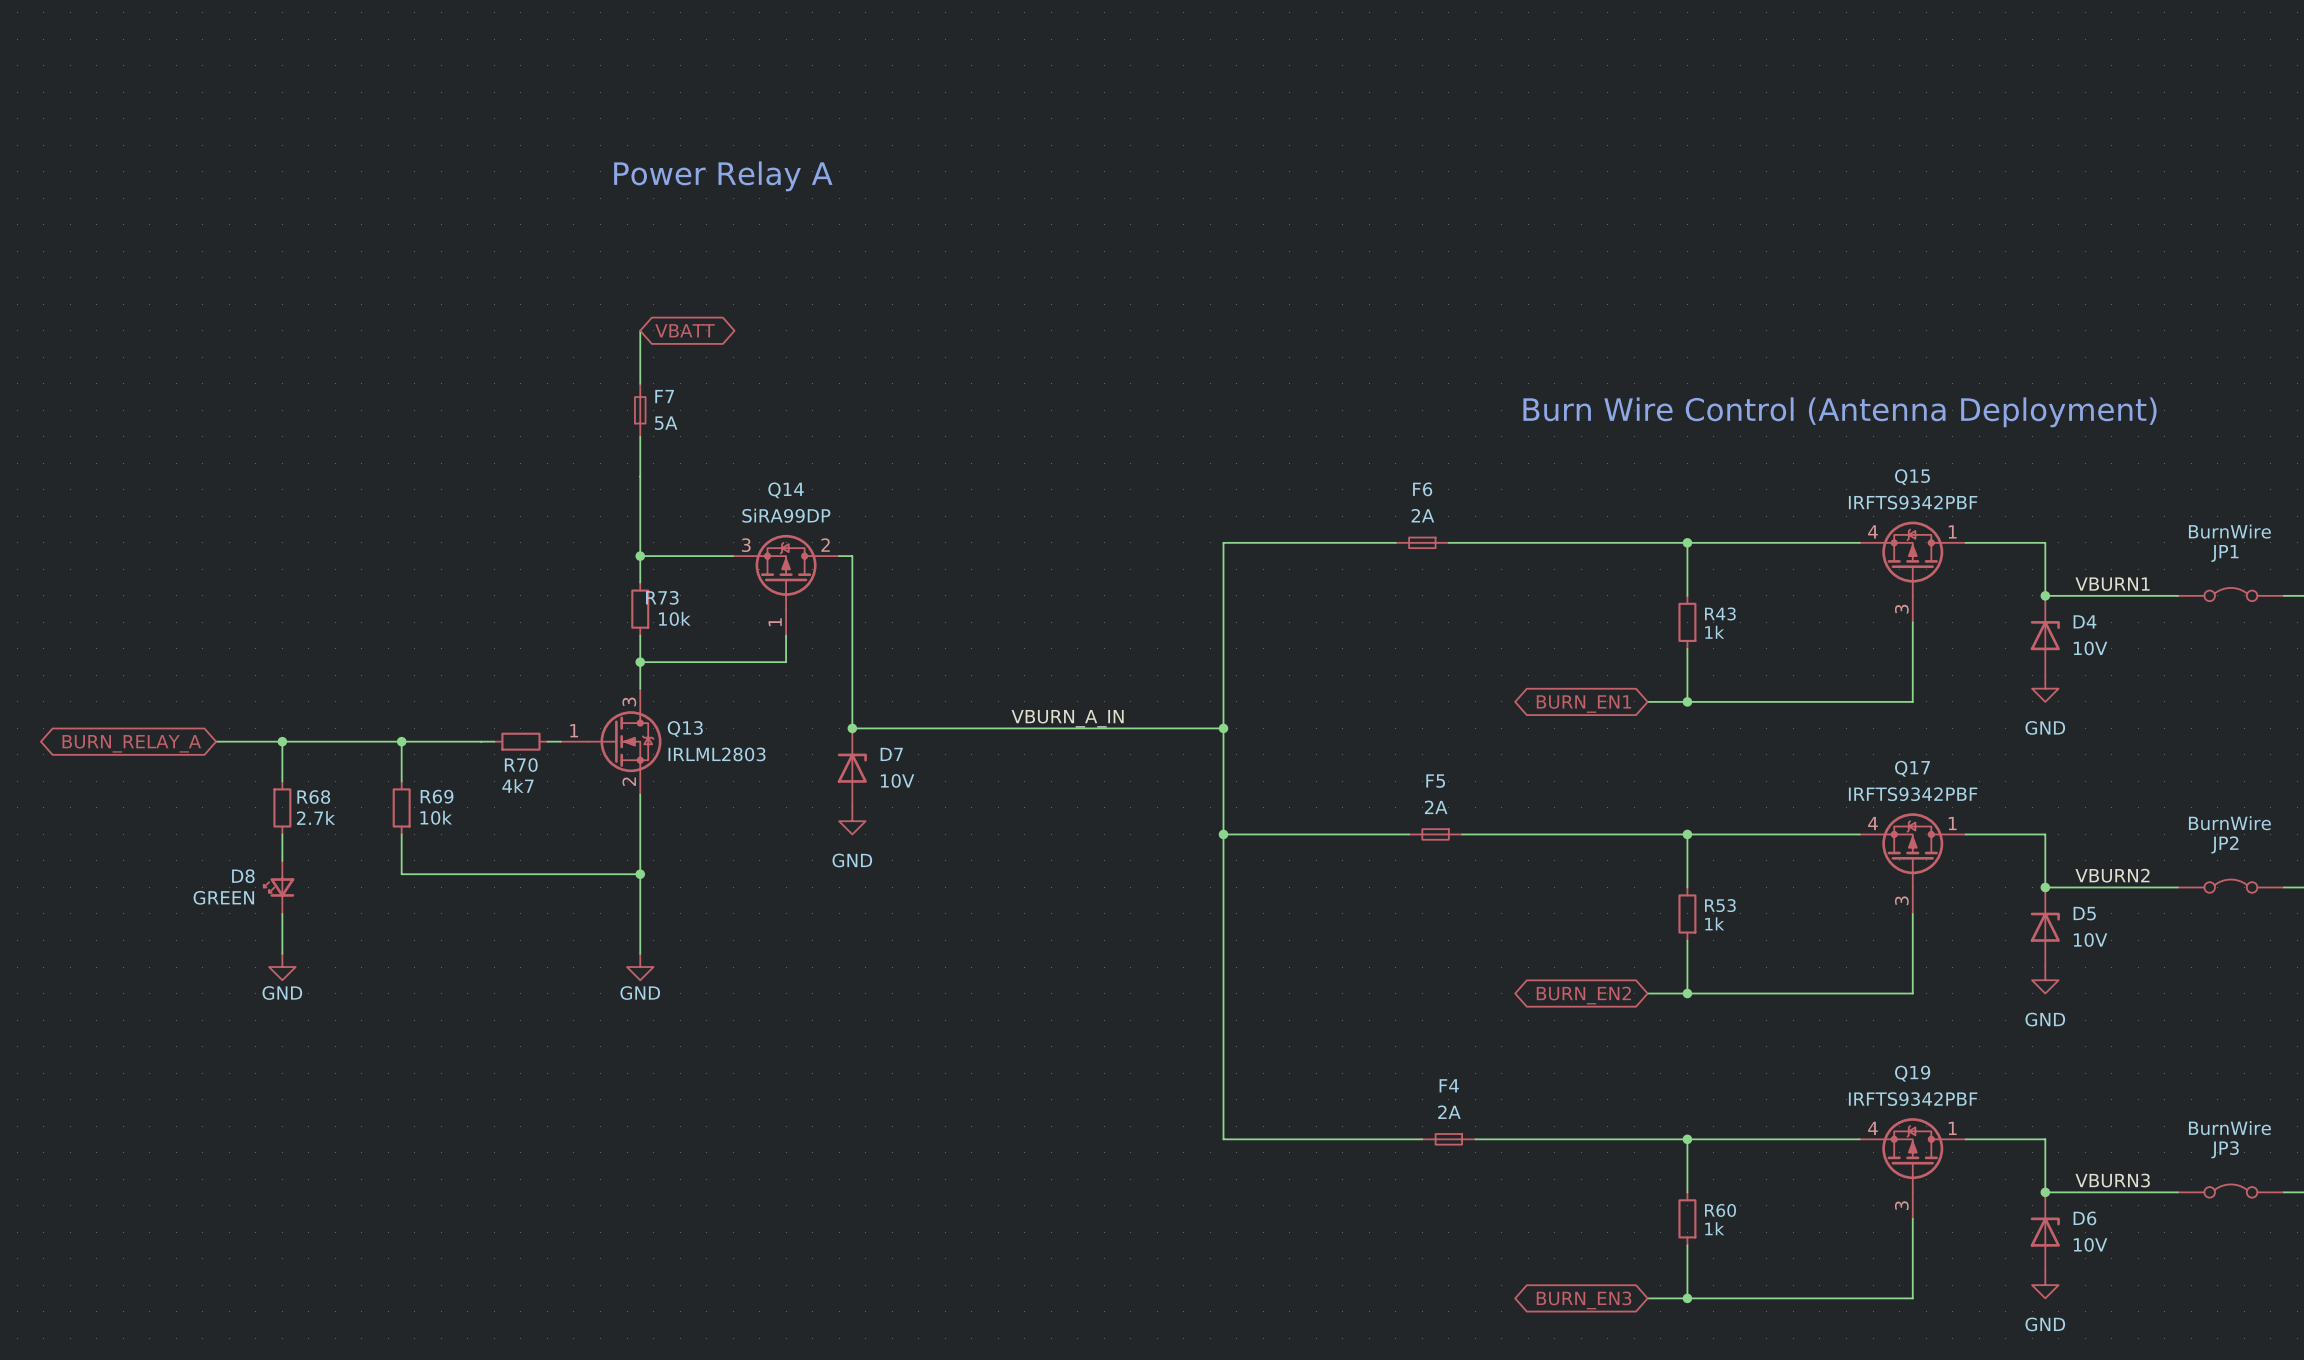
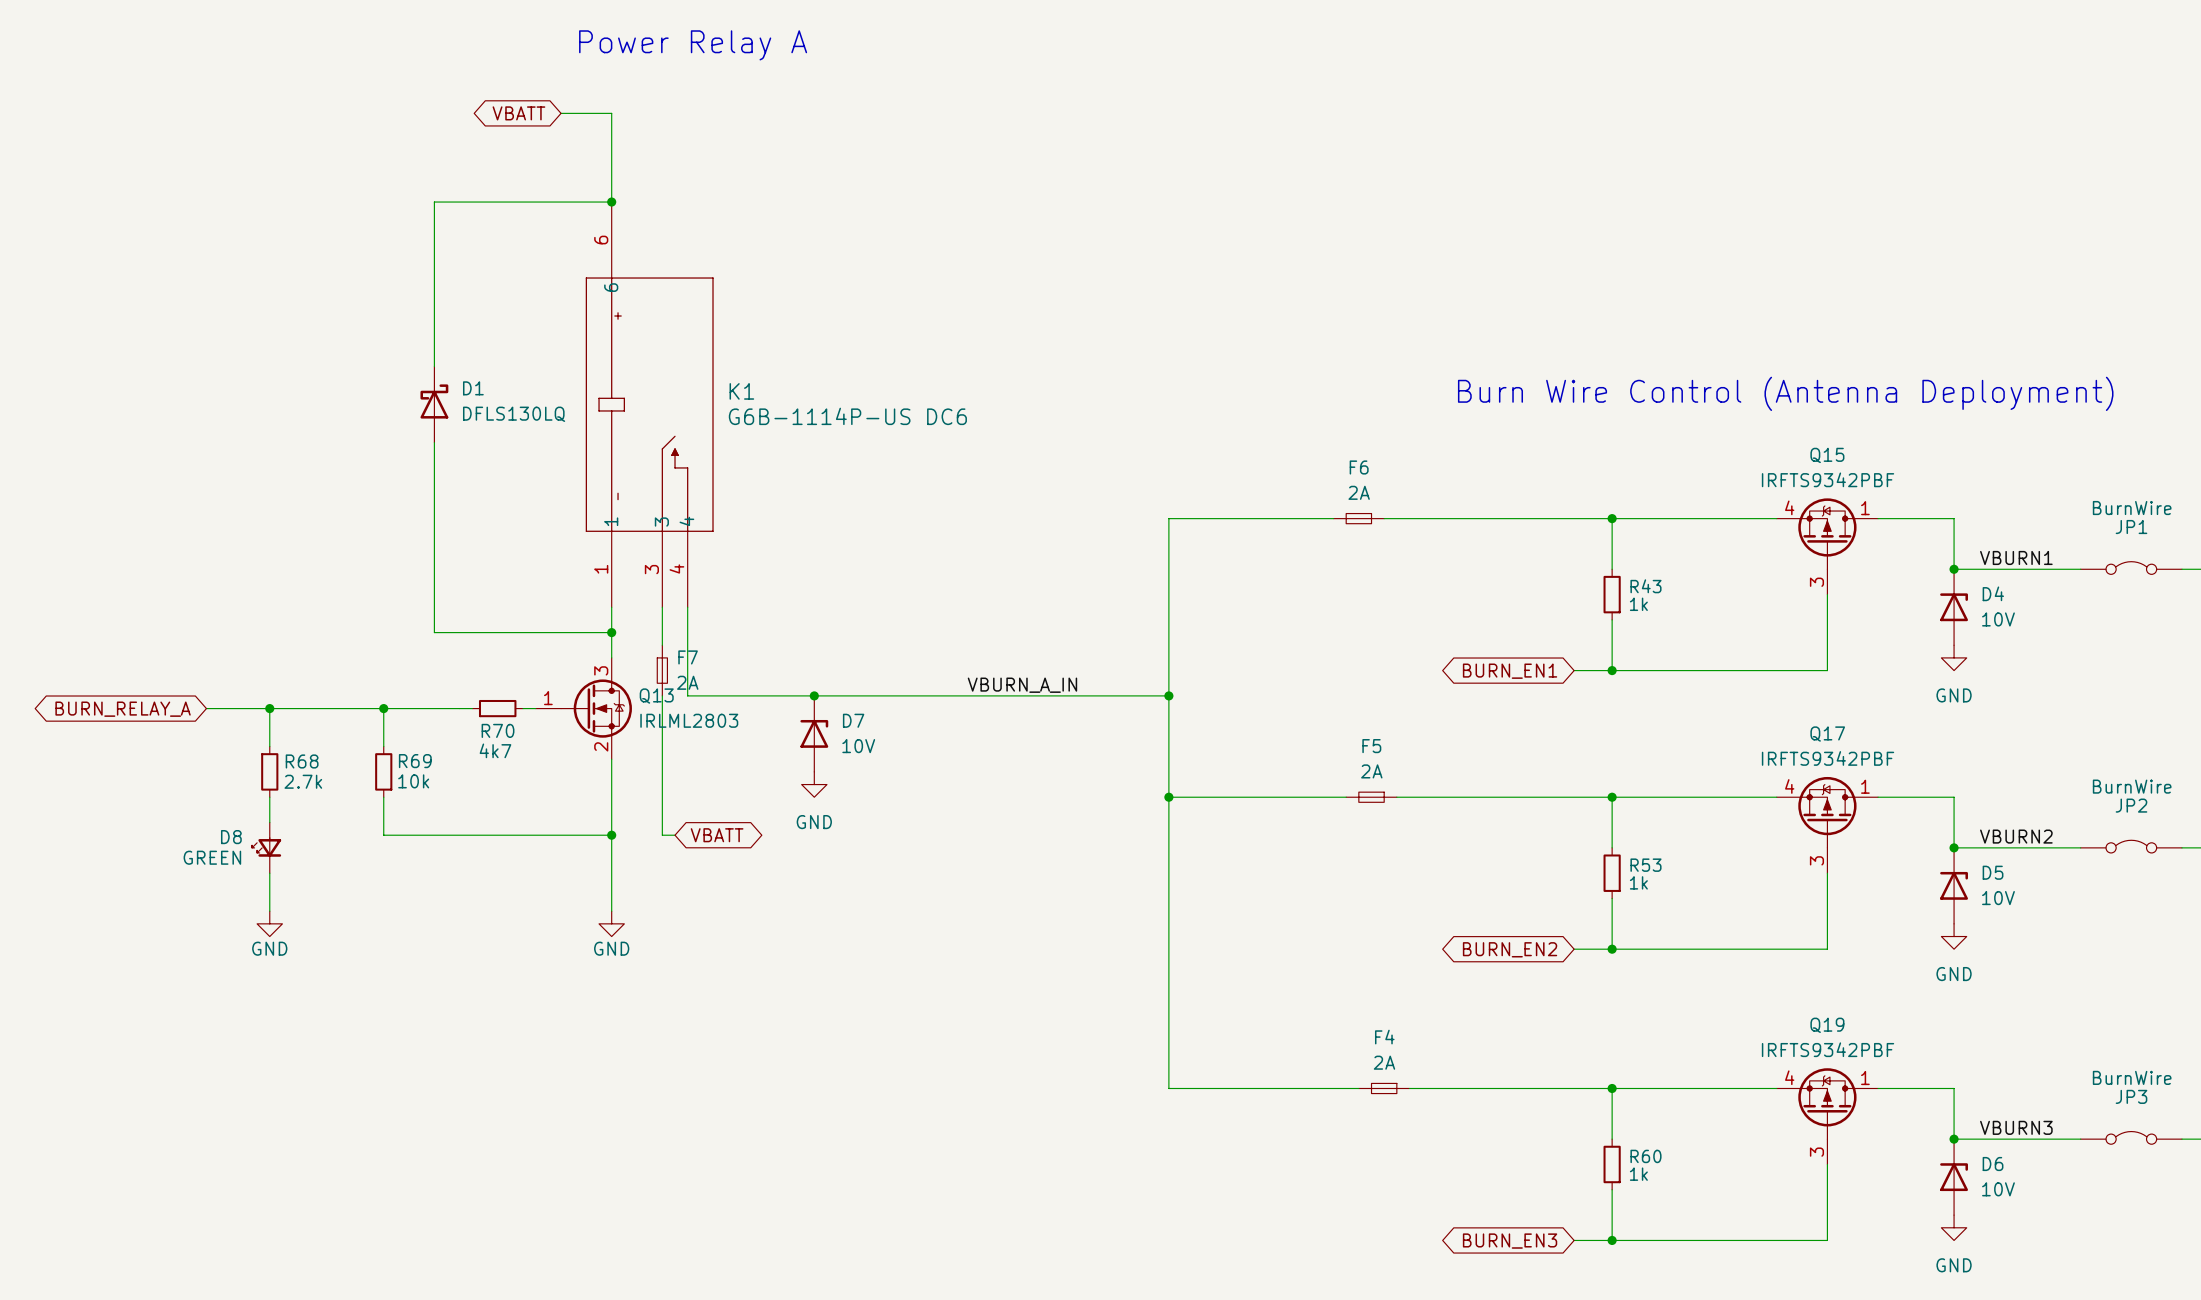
wire: none -> (561, 113) (611, 113) (611, 202) (434, 202) (434, 366)
text position: Power Relay A (723, 176) -> Power Relay A (693, 45)
junction: none -> (611, 202)
global label rotation: 0° (685, 330) -> 180° (518, 113)
global label position: VBATT (685, 330) -> VBATT (518, 113)
F7 position: (640, 410) -> (662, 670)
D1: none -> DFLS130LQ (434, 404)
F7 value: 5A (666, 423) -> 2A (687, 682)
K1: none -> G6B-1114P-US DC6 (649, 404)
junction: (640, 556) -> none
wire: (839, 556) (852, 556) (852, 728) -> (687, 607) (687, 695) (814, 695)
Q14: SiRA99DP (786, 585) -> none
R73: 10k (640, 609) -> none
wire: none -> (662, 607) (662, 645)
wire: (786, 635) (786, 662) (640, 662) -> (434, 442) (434, 632) (611, 632)
wire: none -> (662, 695) (662, 835) (675, 835)
global label: none -> VBATT (717, 835)

